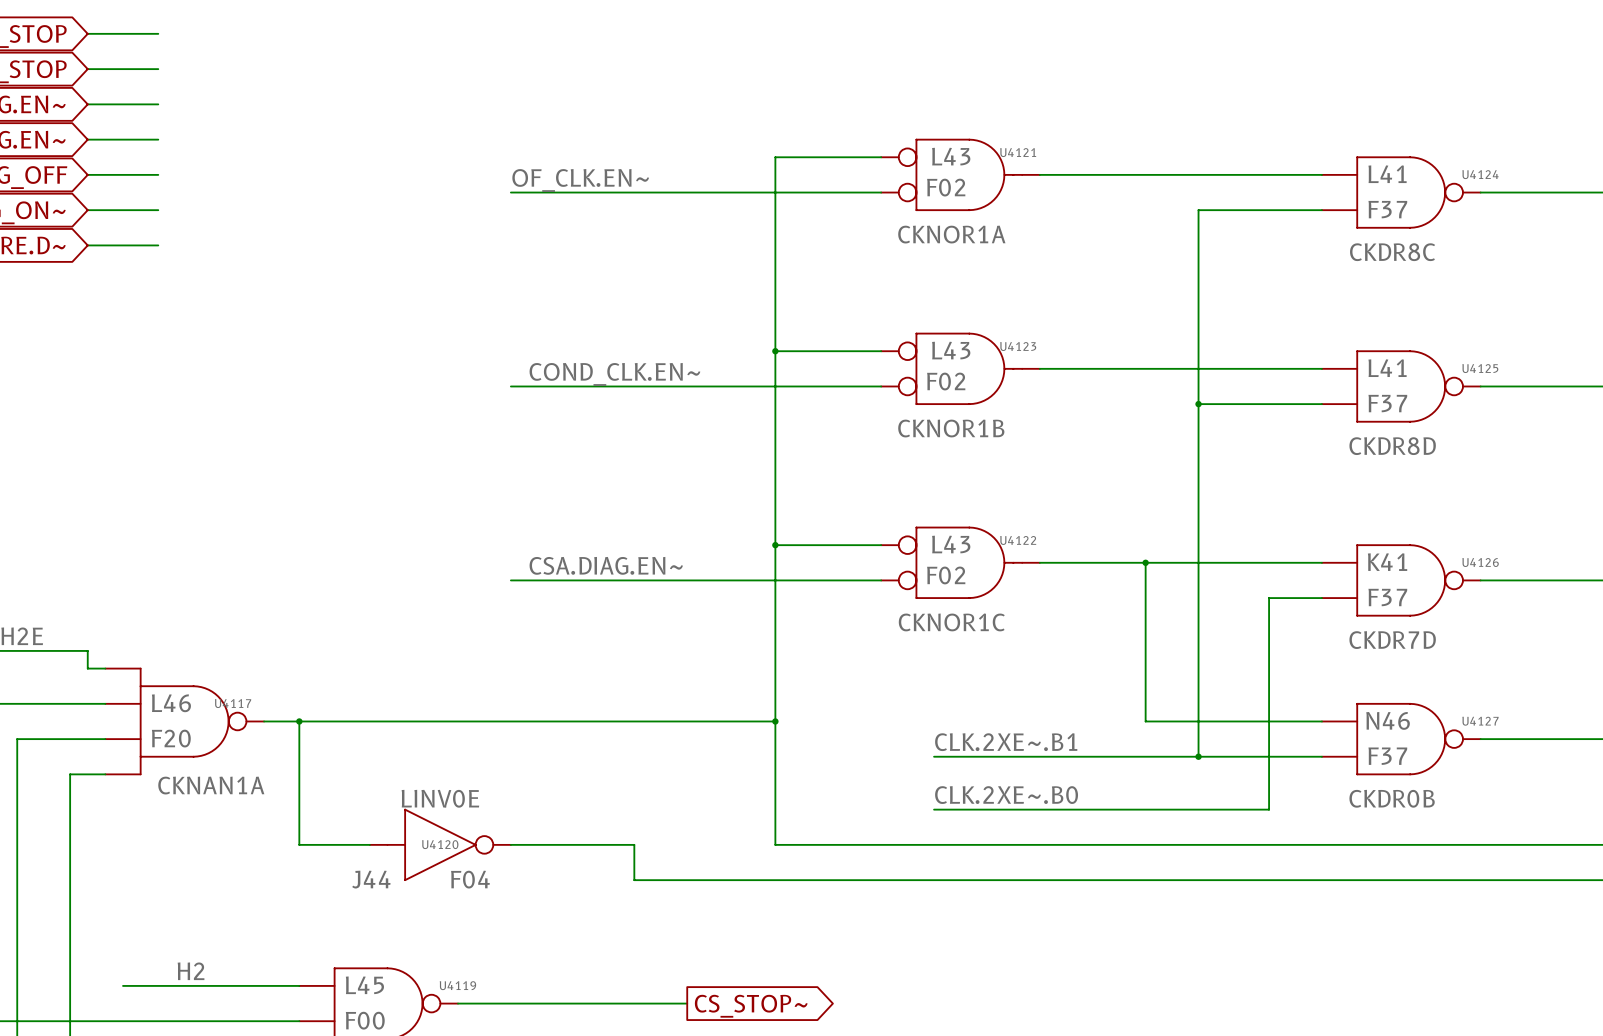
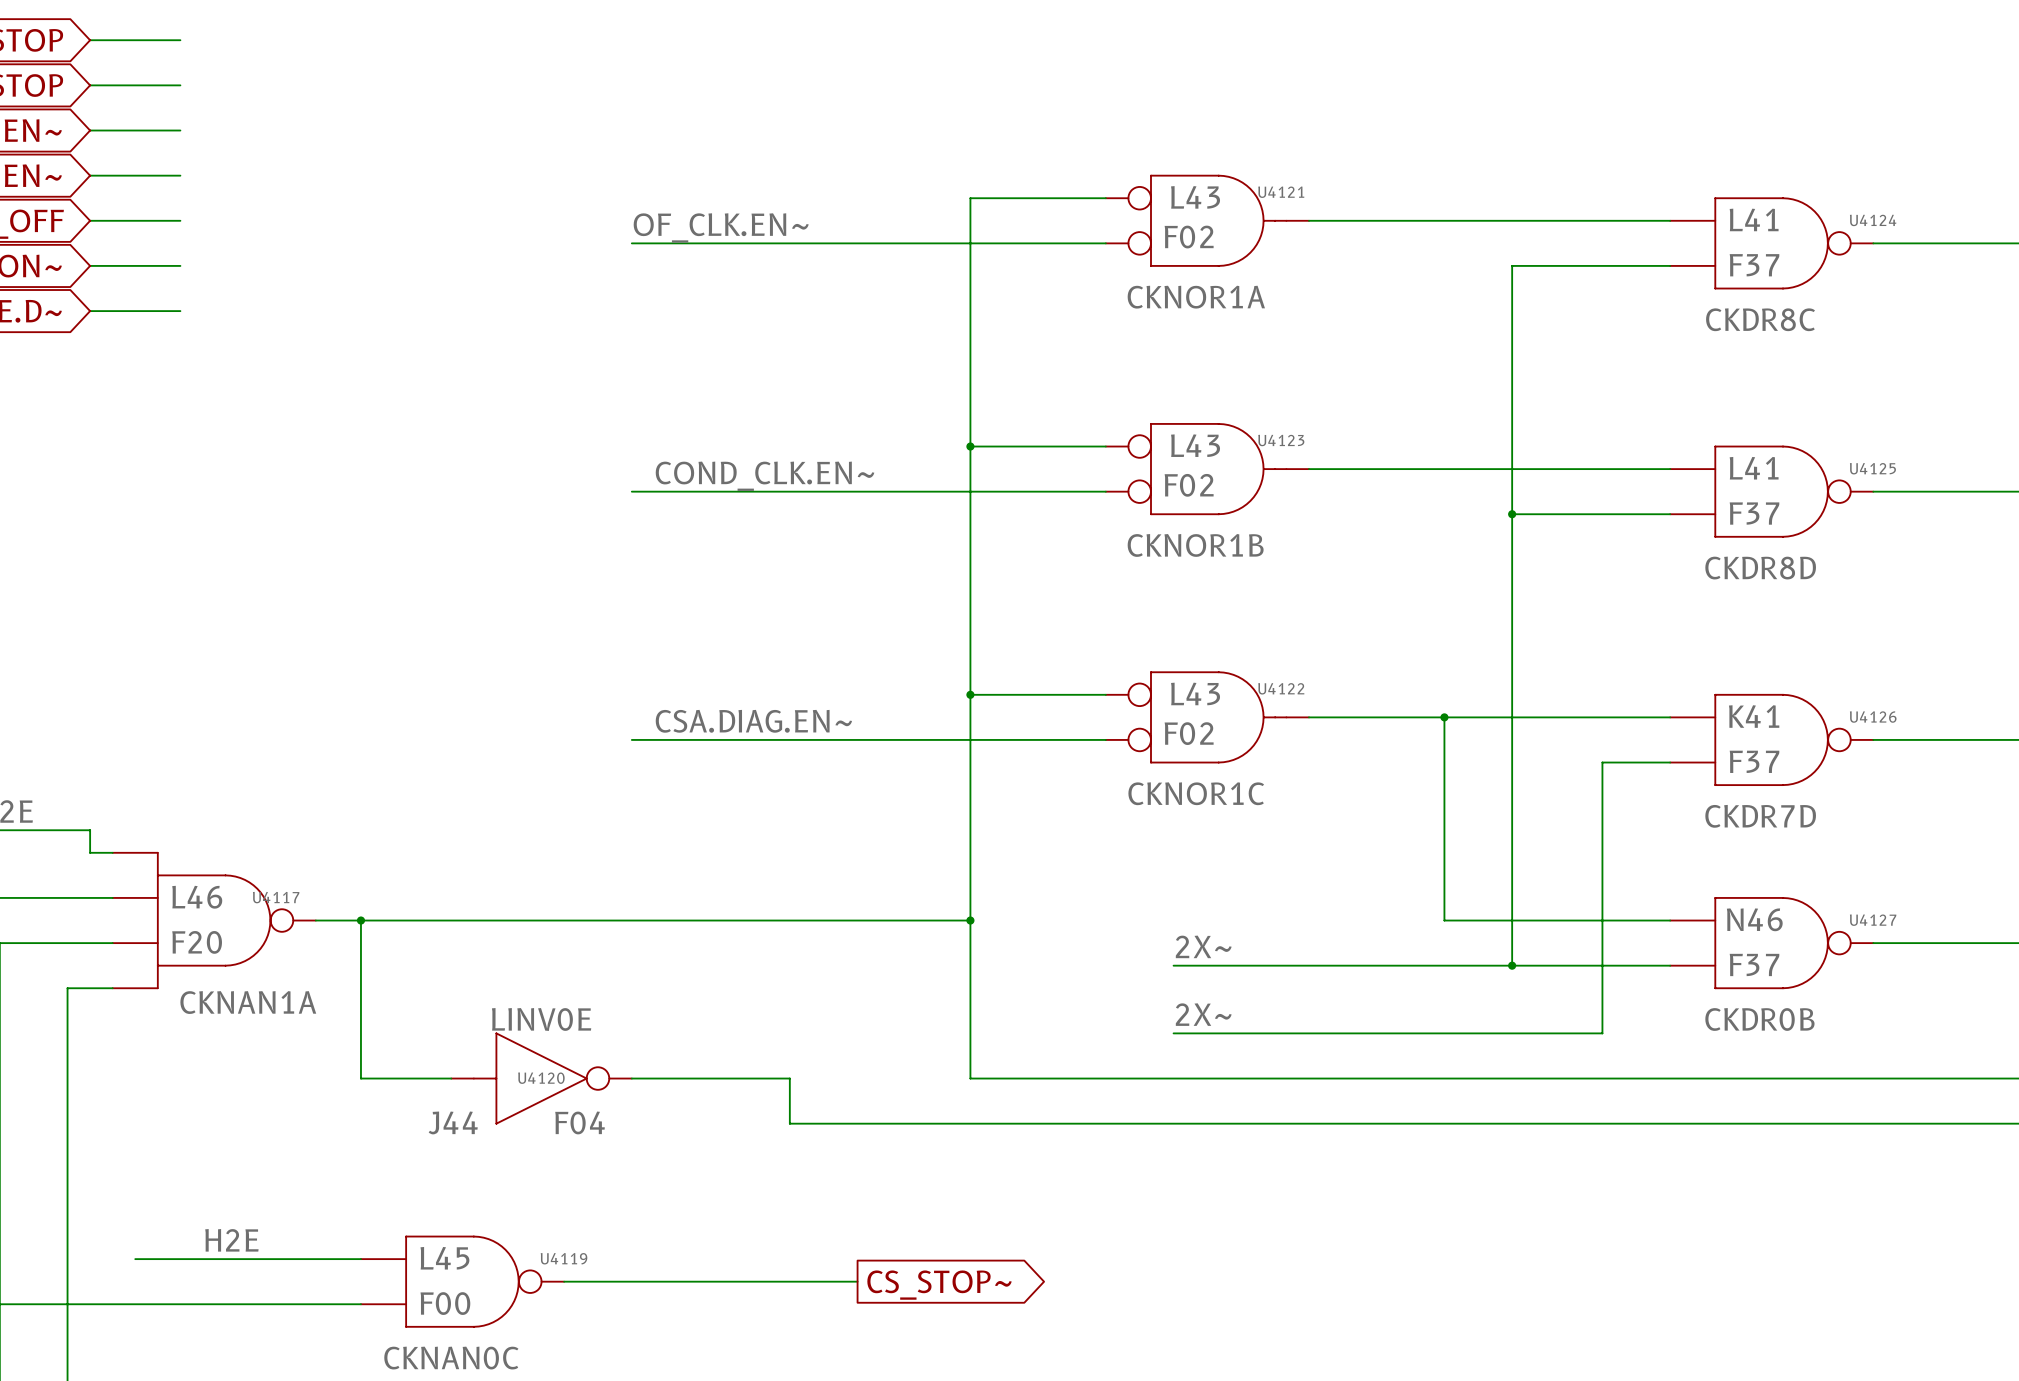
label: CLK.2XE~.B1 (1006, 742) -> 2X~ (1203, 946)
label: CLK.2XE~.B0 (1006, 795) -> 2X~ (1203, 1014)
label: H2 (191, 971) -> H2E (231, 1240)

